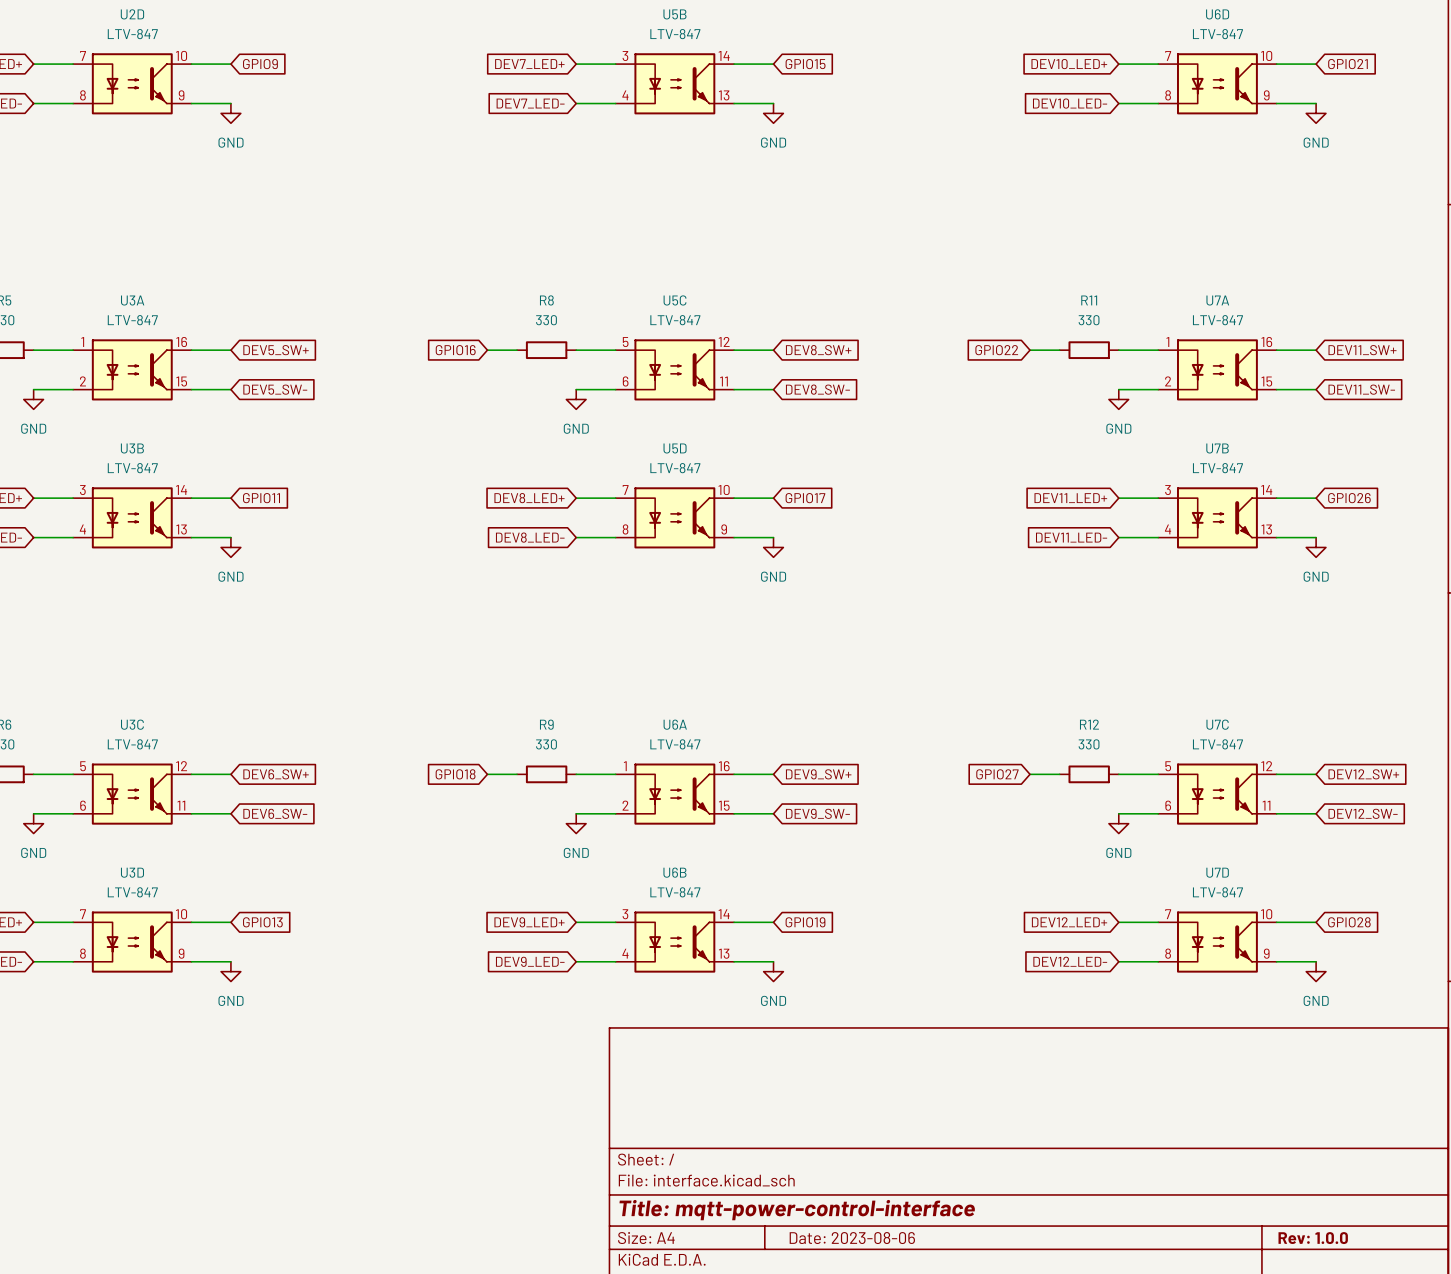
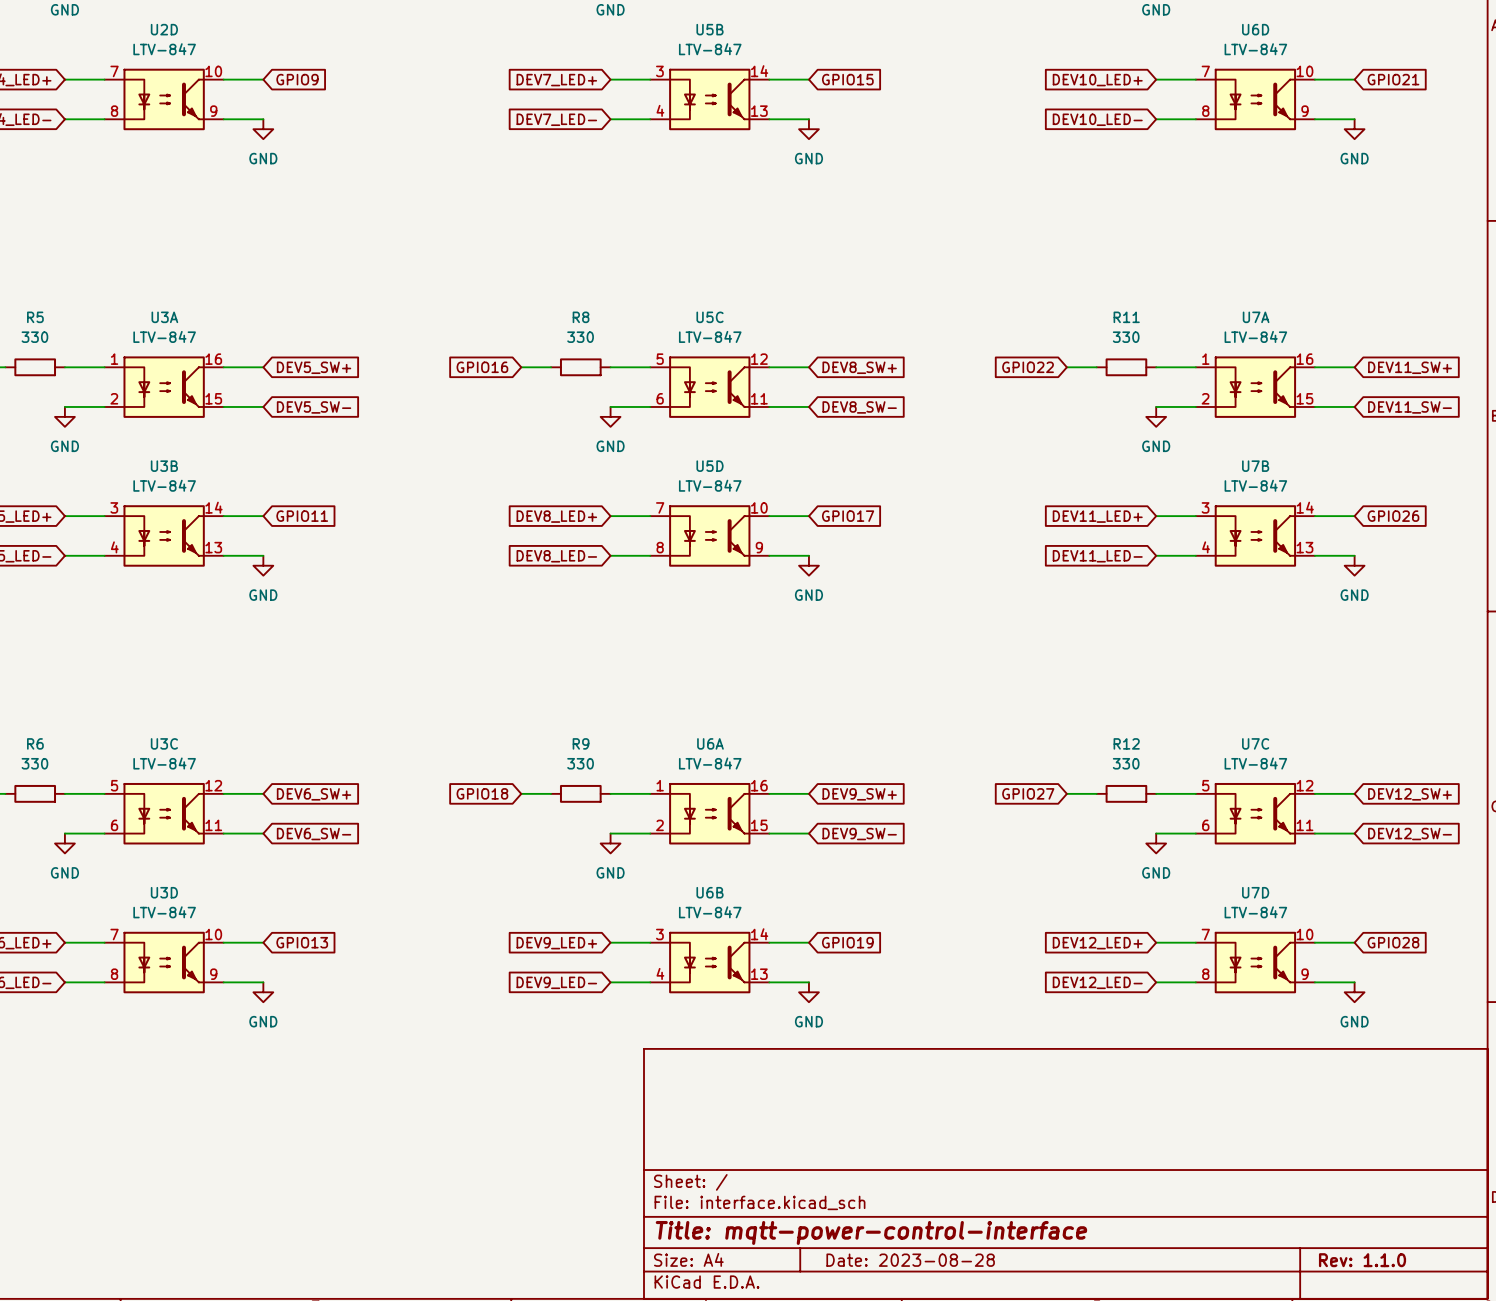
title block: Date: 2023-08-06 (852, 1238) -> Date: 2023-08-28 (910, 1260)
title block: Rev: 1.0.0 (1313, 1238) -> Rev: 1.1.0 (1362, 1260)

